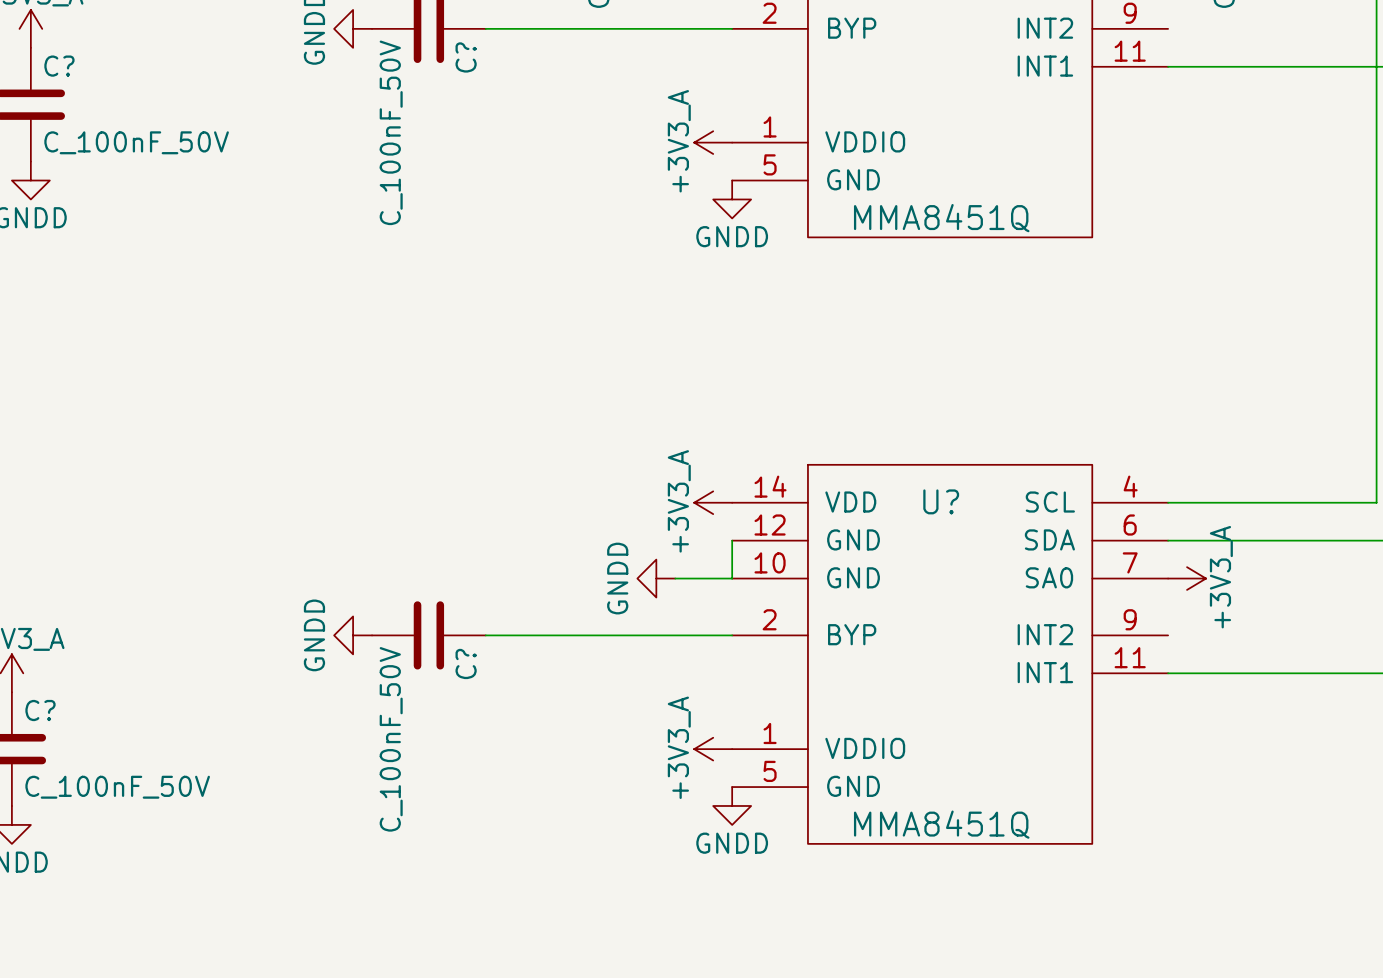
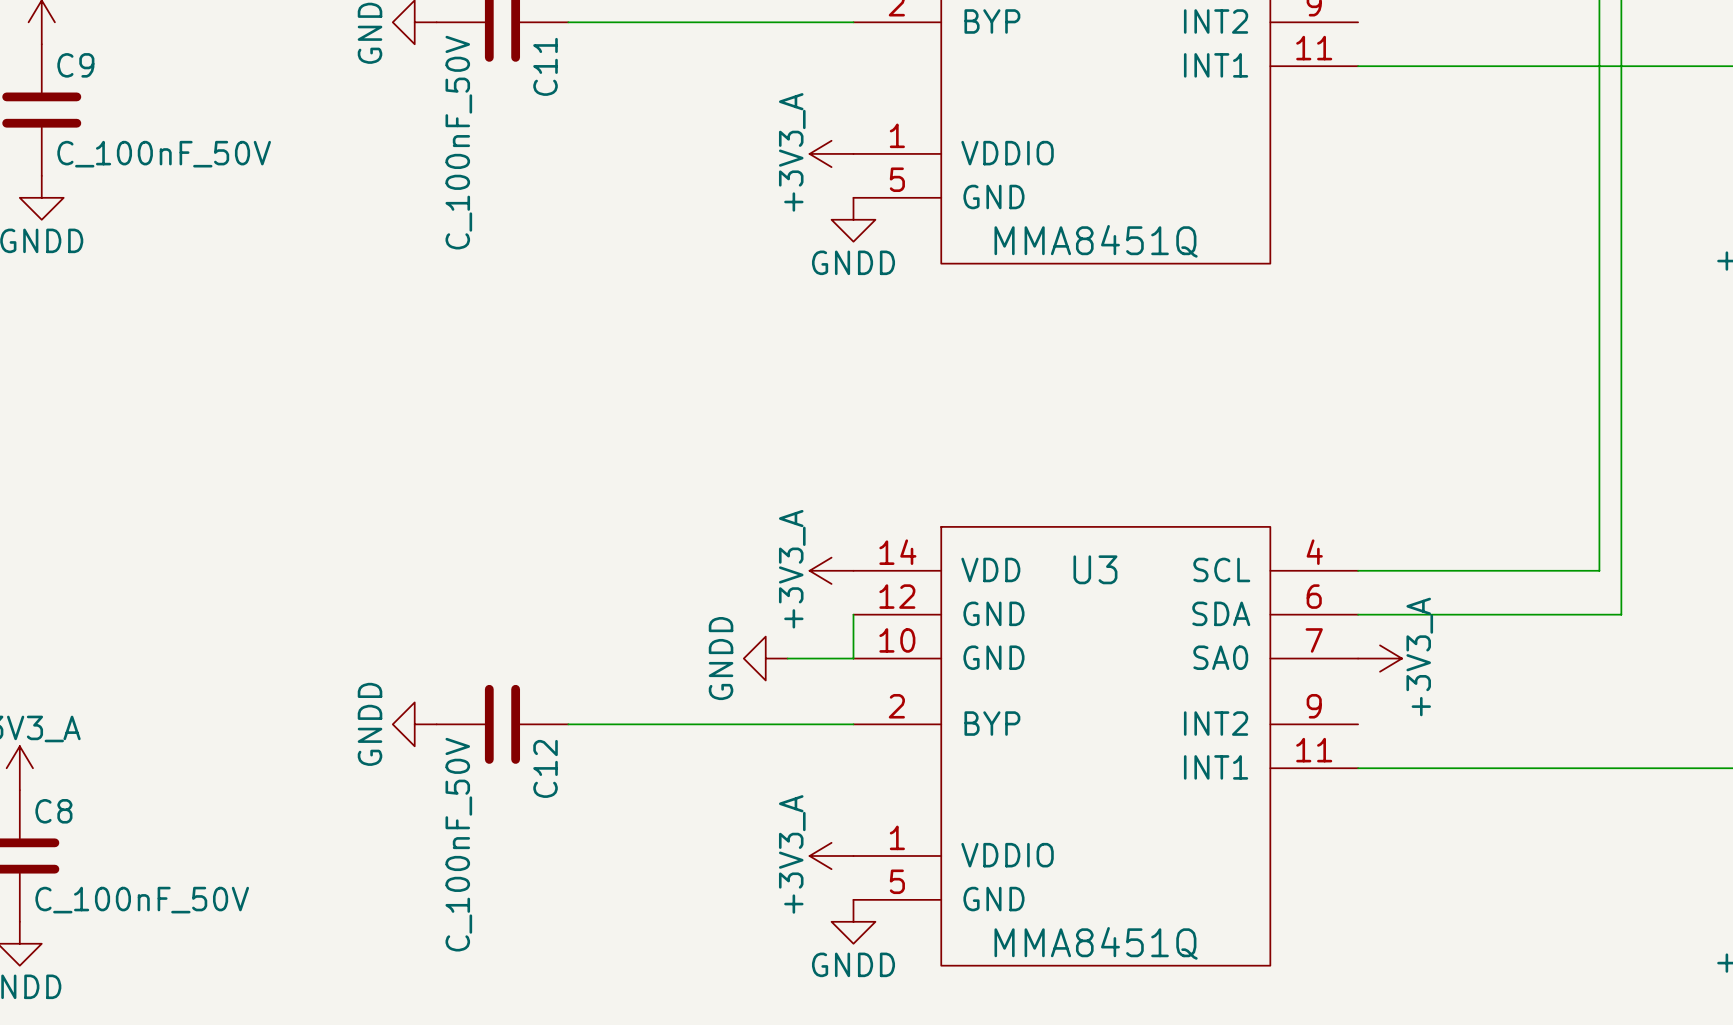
C? name: C? (466, 57) -> C11 (545, 66)
C? name: C? (59, 66) -> C9 (75, 65)
U? name: U? (941, 501) -> U3 (1095, 569)
C? name: C? (466, 663) -> C12 (545, 768)
C? name: C? (40, 710) -> C8 (53, 811)

